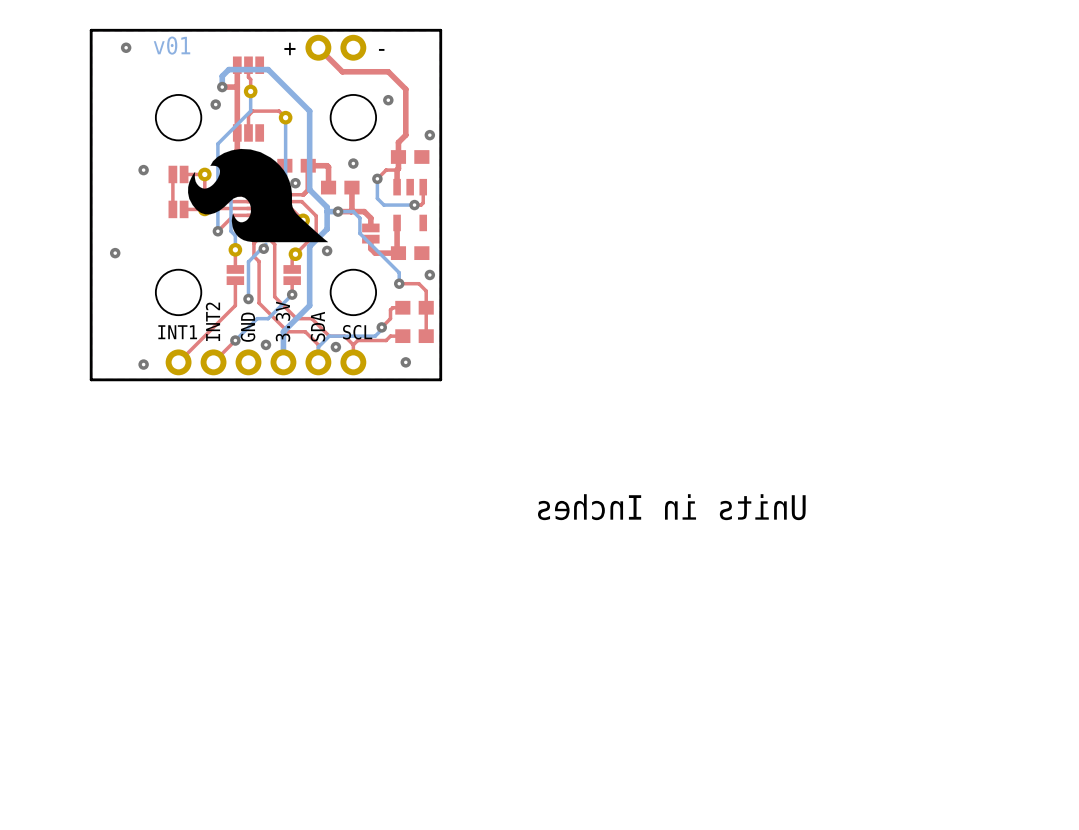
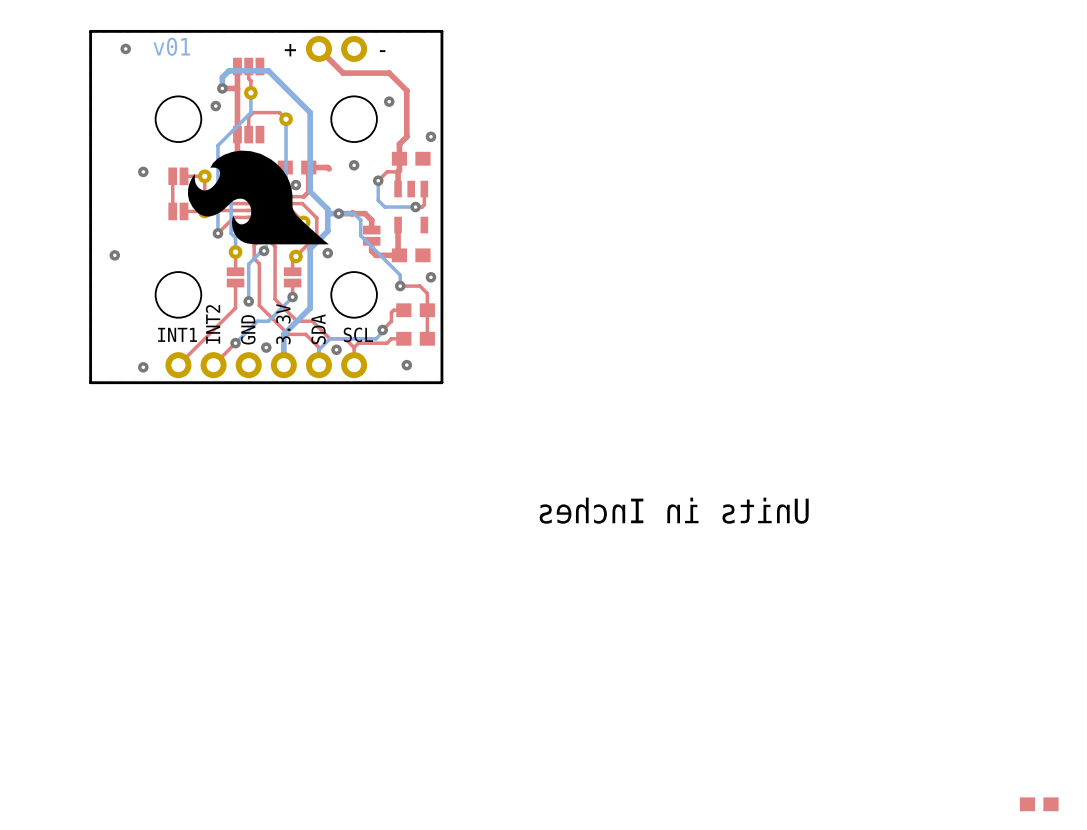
top track: (328, 167) (328, 187) -> none
part: (340, 187) -> none
top track: (351, 187) (351, 210) -> none
part: none -> (1039, 804)

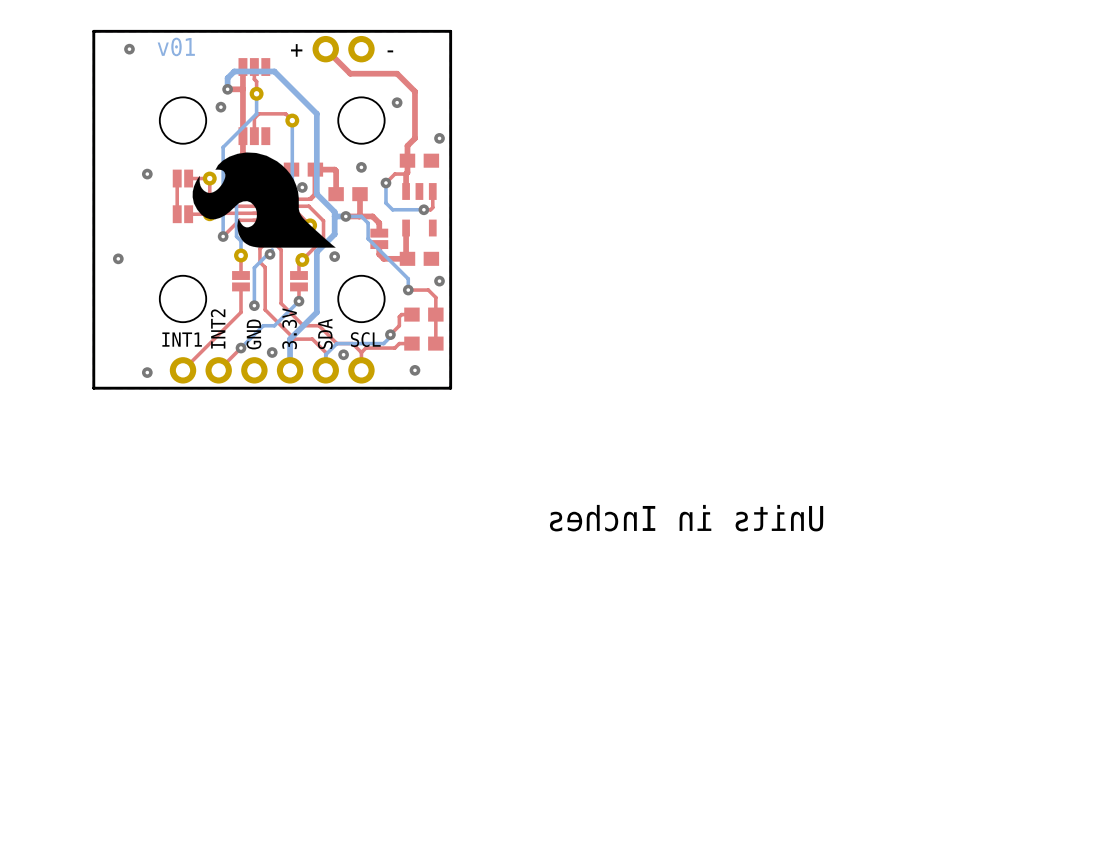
top track: none -> (336, 171) (336, 194)
part: none -> (348, 194)
top track: none -> (360, 194) (360, 215)
part: (1039, 804) -> none

